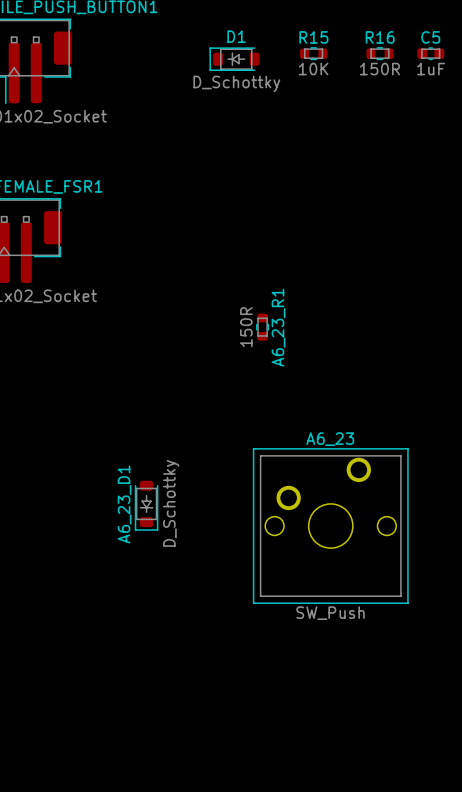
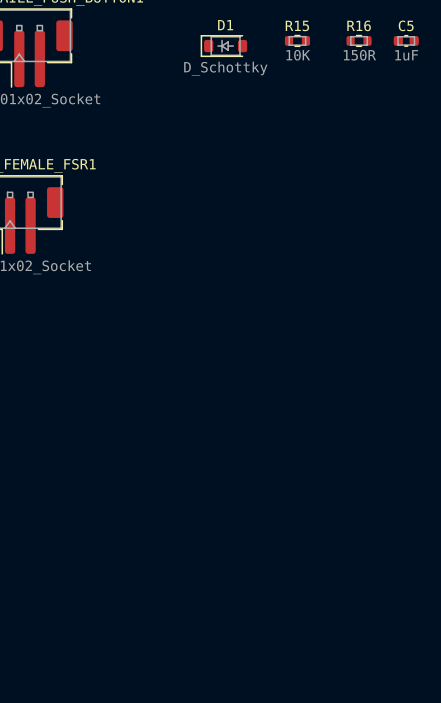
A6_23_R1: 150R (262, 327) -> none
A6_23_D1: D_Schottky (146, 505) -> none
A6_23: SW_Push (330, 526) -> none

